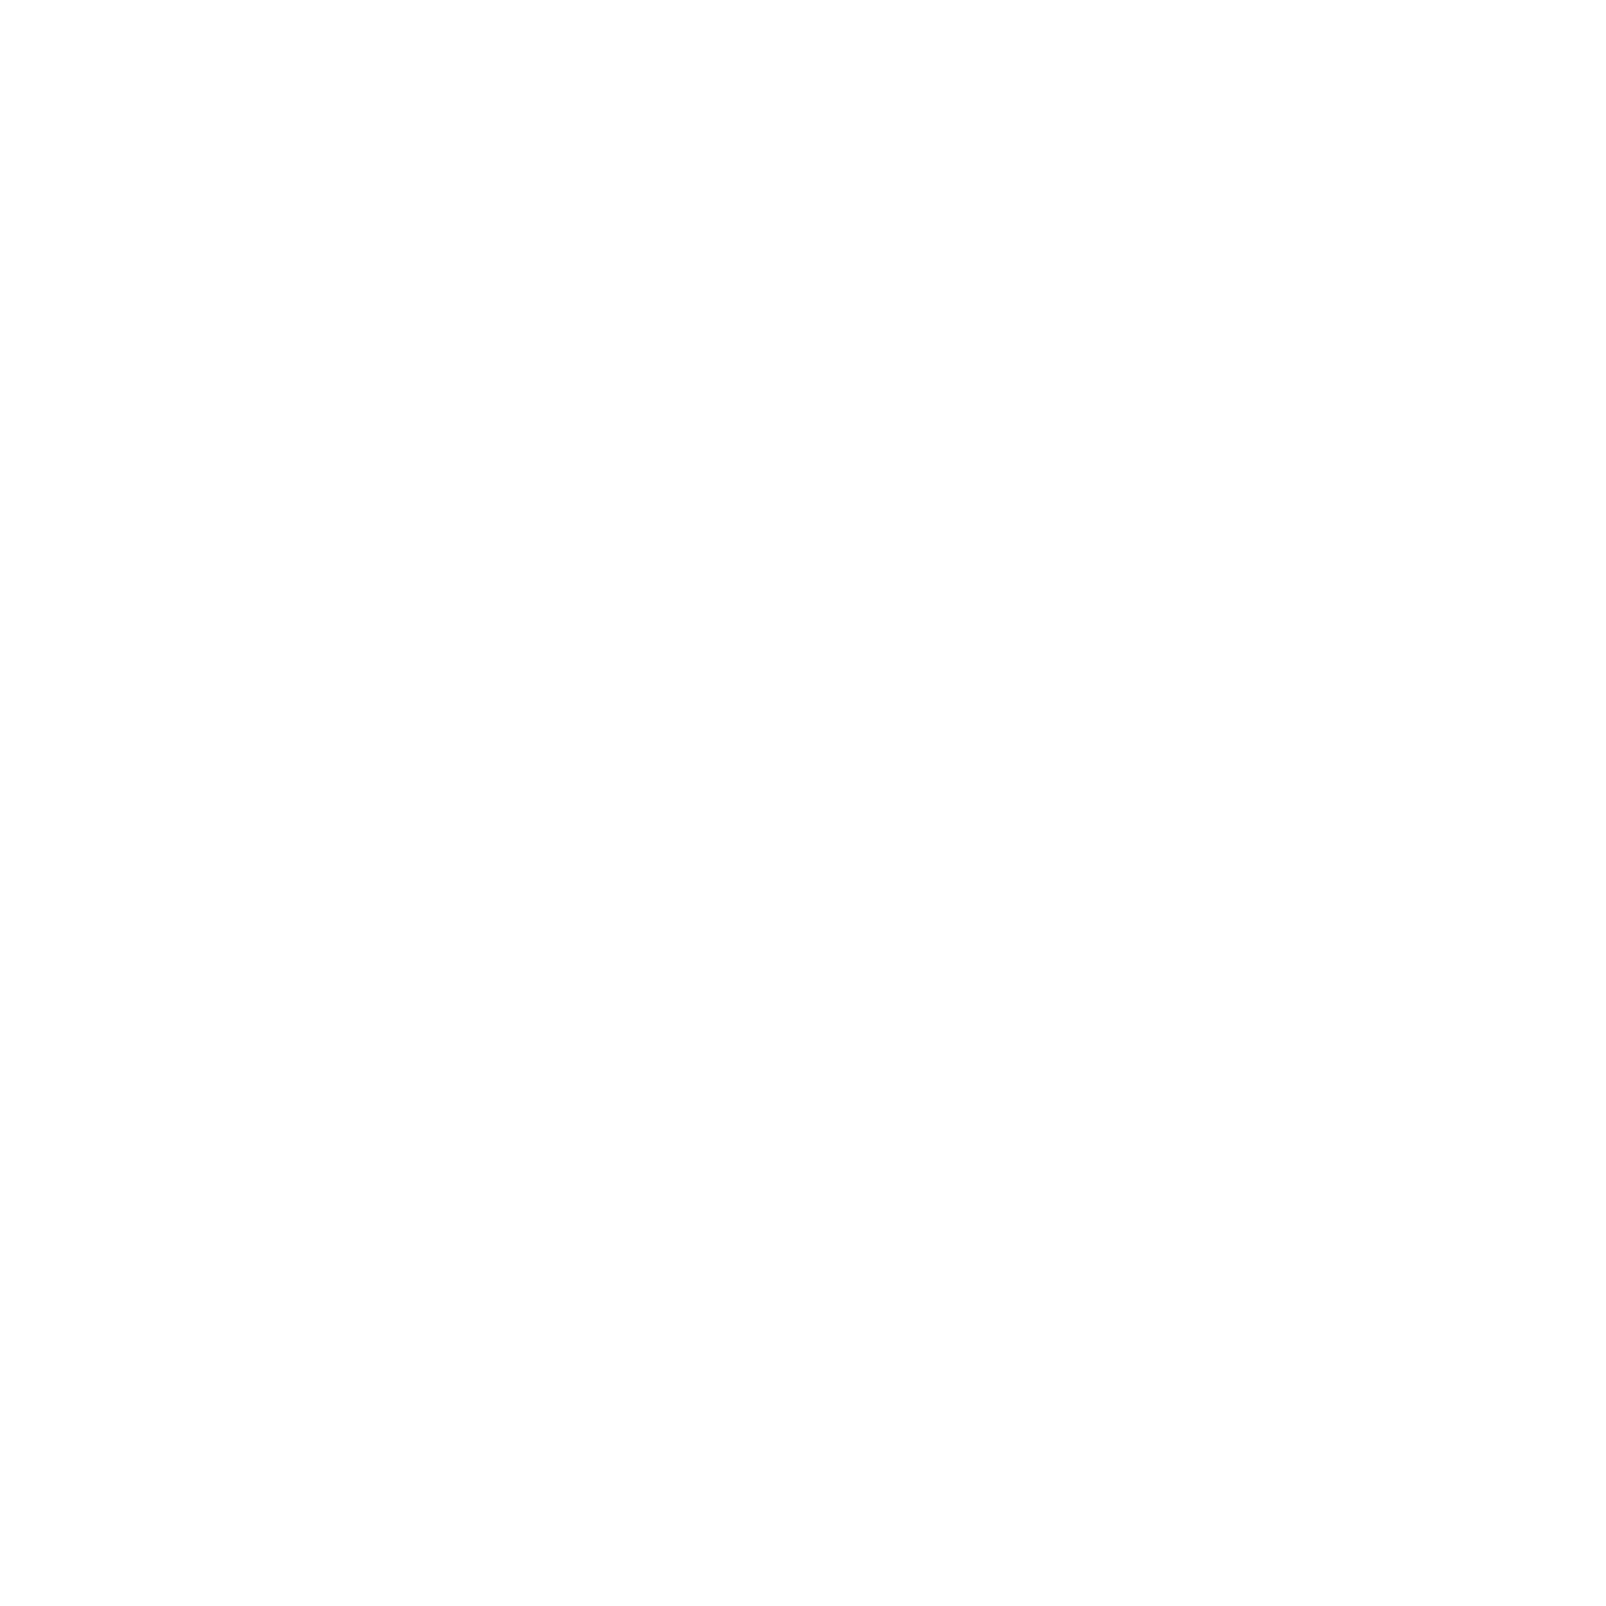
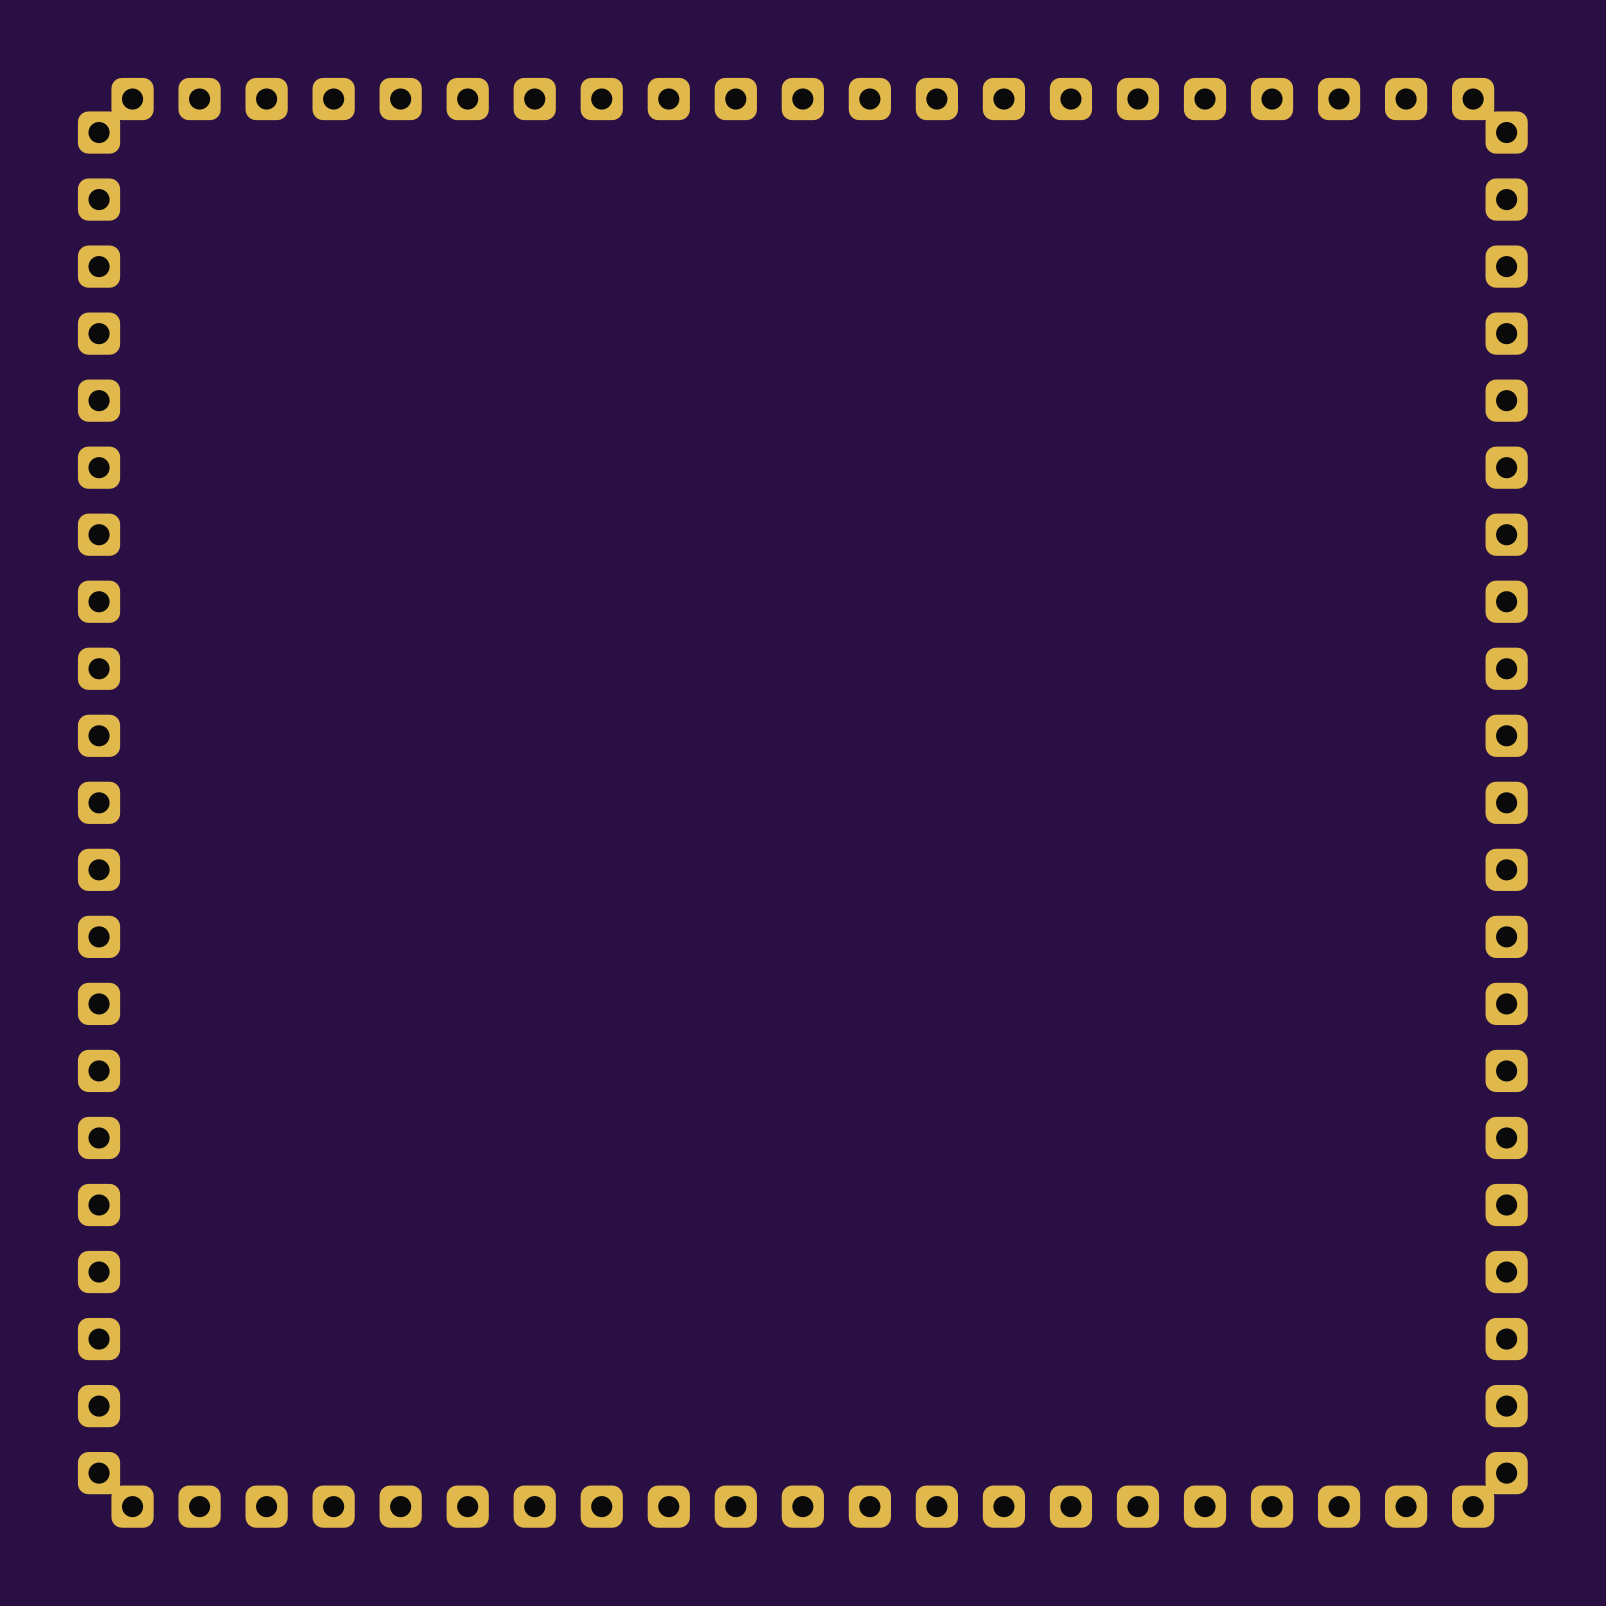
part: none -> (802, 802)

